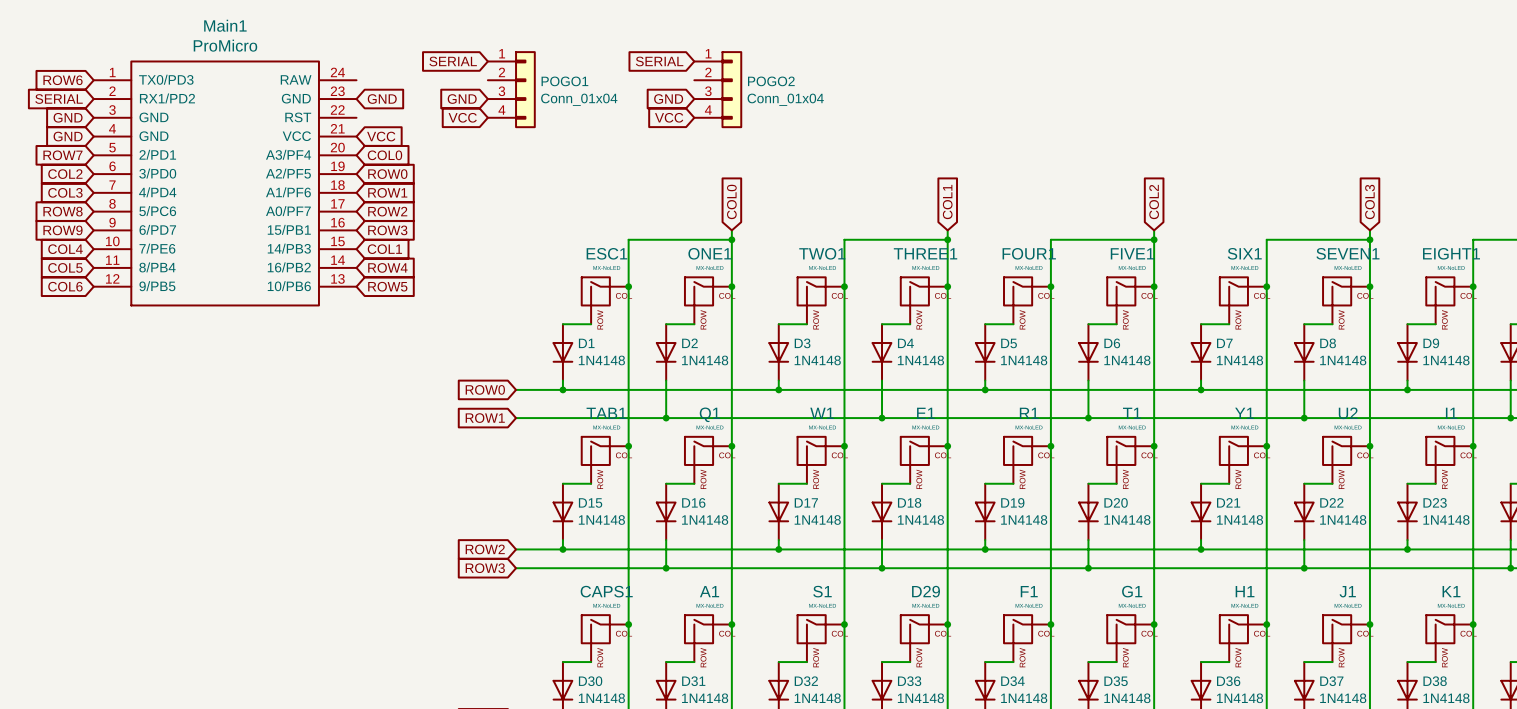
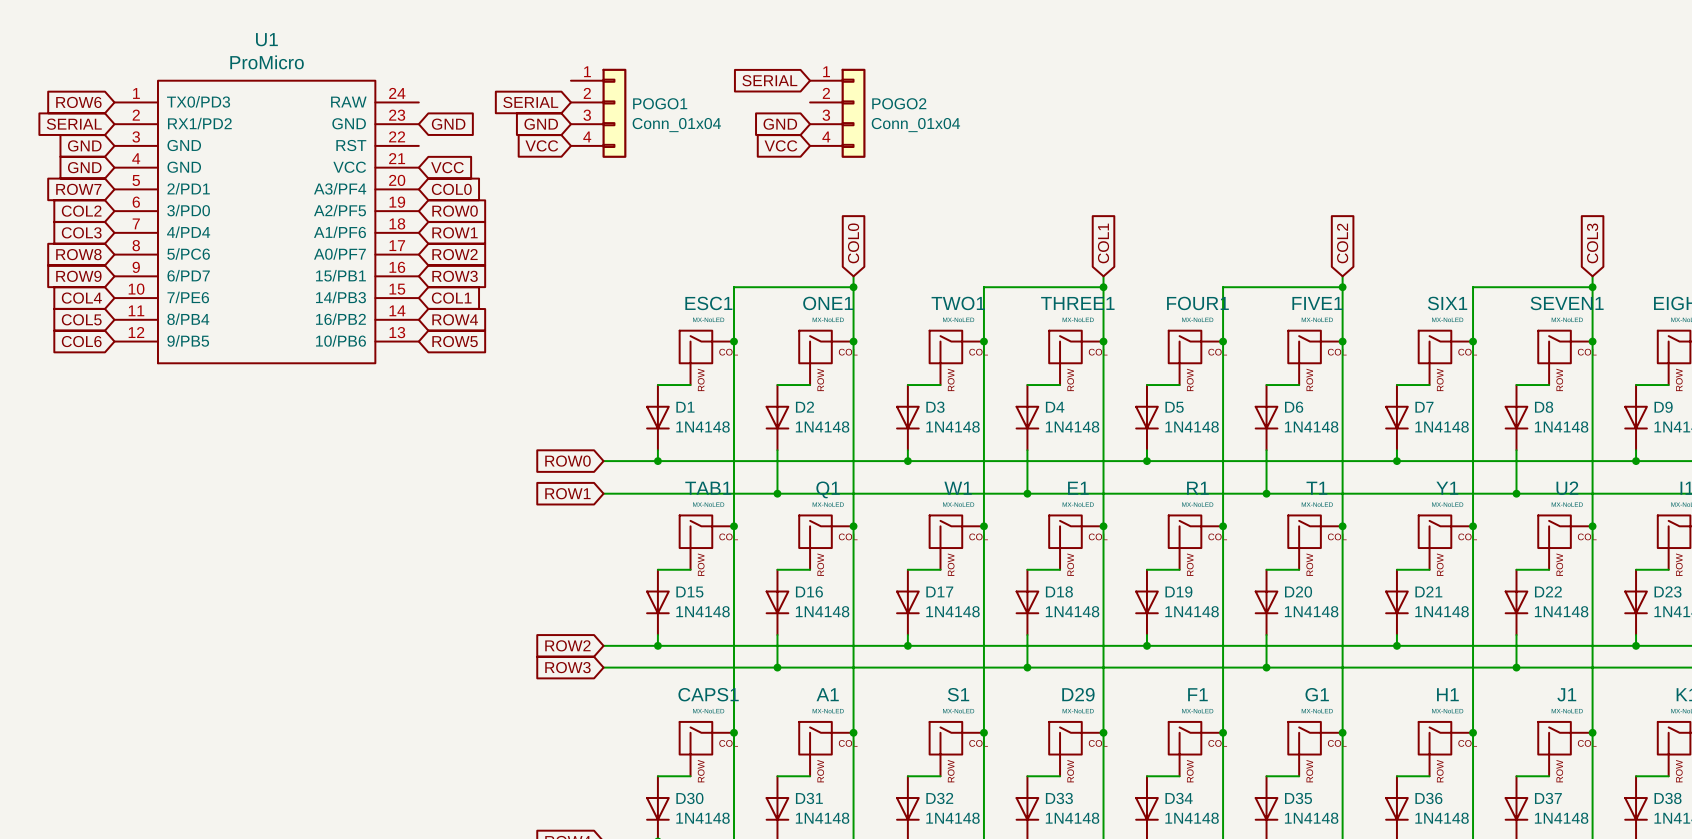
Main1 name: Main1 (225, 25) -> U1 (266, 39)
global label position: SERIAL (453, 61) -> SERIAL (530, 102)

